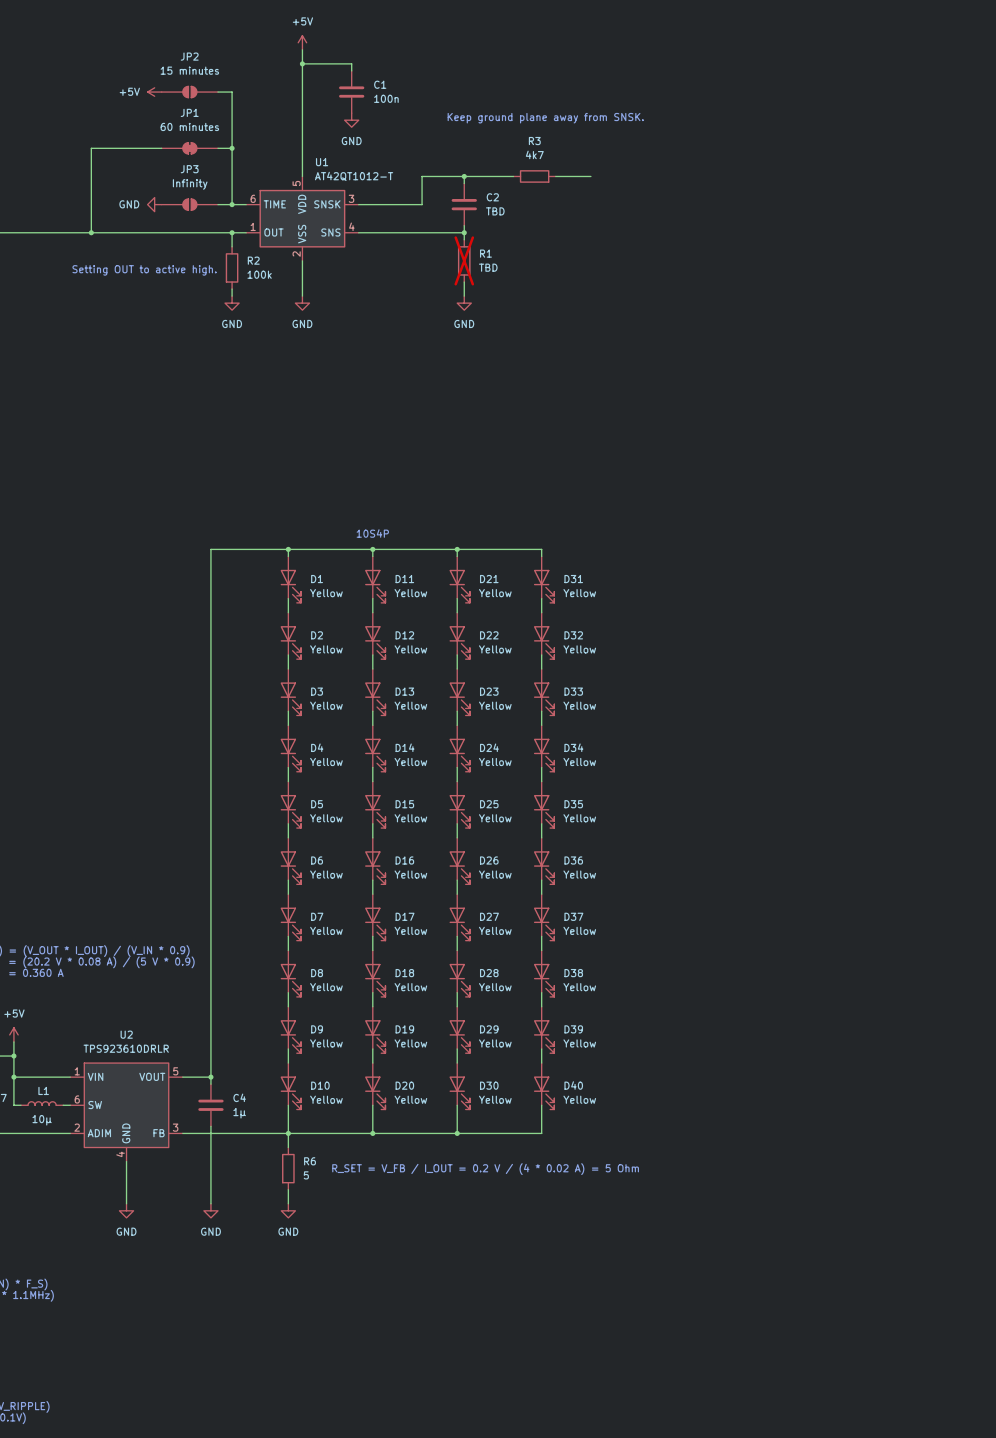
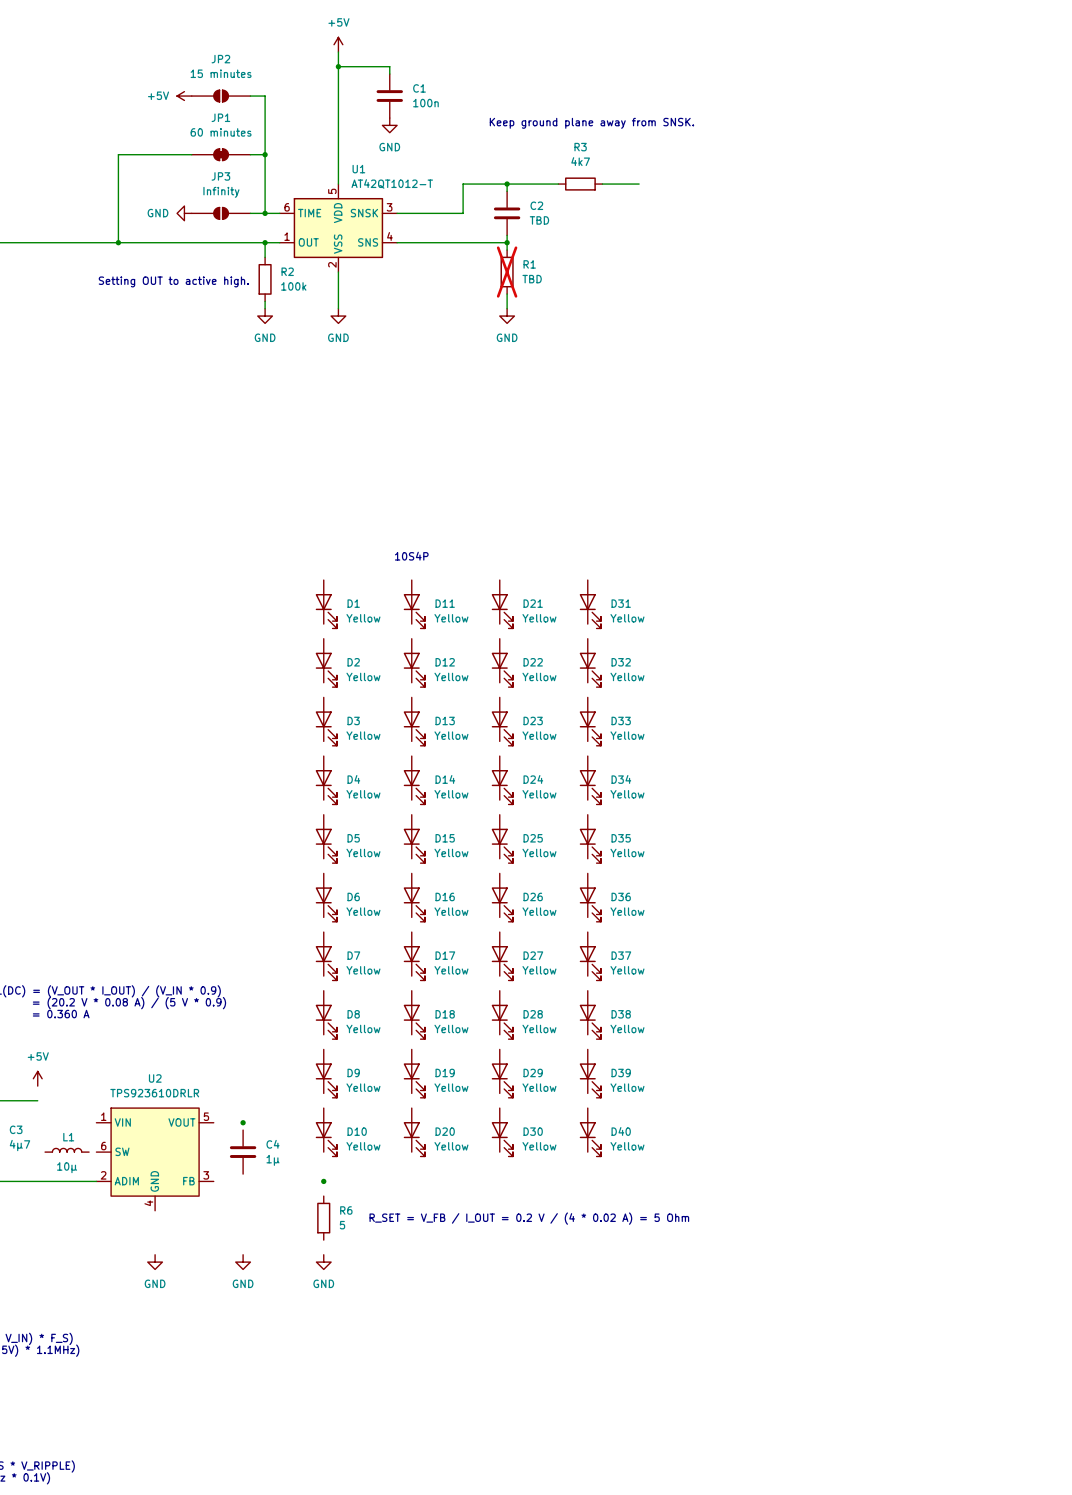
wire: (288, 549) (288, 556) -> none
junction: (288, 549) -> none
wire: (372, 549) (372, 556) -> none
junction: (372, 549) -> none
wire: (457, 549) (457, 556) -> none
junction: (457, 549) -> none
wire: (541, 556) (541, 549) (210, 549) (210, 1084) -> none
wire: (288, 598) (288, 612) -> none
wire: (372, 598) (372, 612) -> none
wire: (457, 598) (457, 612) -> none
wire: (541, 598) (541, 612) -> none
wire: (288, 654) (288, 669) -> none
wire: (372, 654) (372, 669) -> none
wire: (457, 654) (457, 669) -> none
wire: (541, 654) (541, 669) -> none
wire: (288, 711) (288, 725) -> none
wire: (372, 711) (372, 725) -> none
wire: (457, 711) (457, 725) -> none
wire: (541, 711) (541, 725) -> none
wire: (288, 767) (288, 781) -> none
wire: (372, 767) (372, 781) -> none
wire: (457, 767) (457, 781) -> none
wire: (541, 767) (541, 781) -> none
wire: (288, 823) (288, 837) -> none
wire: (372, 823) (372, 837) -> none
wire: (457, 823) (457, 837) -> none
wire: (541, 823) (541, 837) -> none
wire: (288, 880) (288, 894) -> none
wire: (372, 880) (372, 894) -> none
wire: (457, 880) (457, 894) -> none
wire: (541, 880) (541, 894) -> none
wire: (288, 936) (288, 950) -> none
wire: (372, 936) (372, 950) -> none
wire: (457, 936) (457, 950) -> none
wire: (541, 936) (541, 950) -> none
wire: (288, 992) (288, 1006) -> none
wire: (372, 992) (372, 1006) -> none
wire: (457, 992) (457, 1006) -> none
wire: (541, 992) (541, 1006) -> none
wire: (13, 1041) (13, 1105) (20, 1105) -> none
wire: (288, 1048) (288, 1063) -> none
wire: (372, 1048) (372, 1063) -> none
wire: (457, 1048) (457, 1063) -> none
wire: (541, 1048) (541, 1063) -> none
junction: (13, 1056) -> none
wire: (13, 1077) (70, 1077) -> none
junction: (13, 1077) -> none
wire: (182, 1077) (210, 1077) -> none
wire: (63, 1105) (70, 1105) -> none
wire: (288, 1105) (288, 1147) -> none
wire: (372, 1105) (372, 1133) -> none
wire: (457, 1105) (457, 1133) -> none
wire: (541, 1105) (541, 1133) (182, 1133) -> none
wire: (210, 1126) (210, 1203) -> none
junction: (372, 1133) -> none
junction: (457, 1133) -> none
wire: (126, 1161) (126, 1203) -> none
wire: (288, 1189) (288, 1203) -> none

